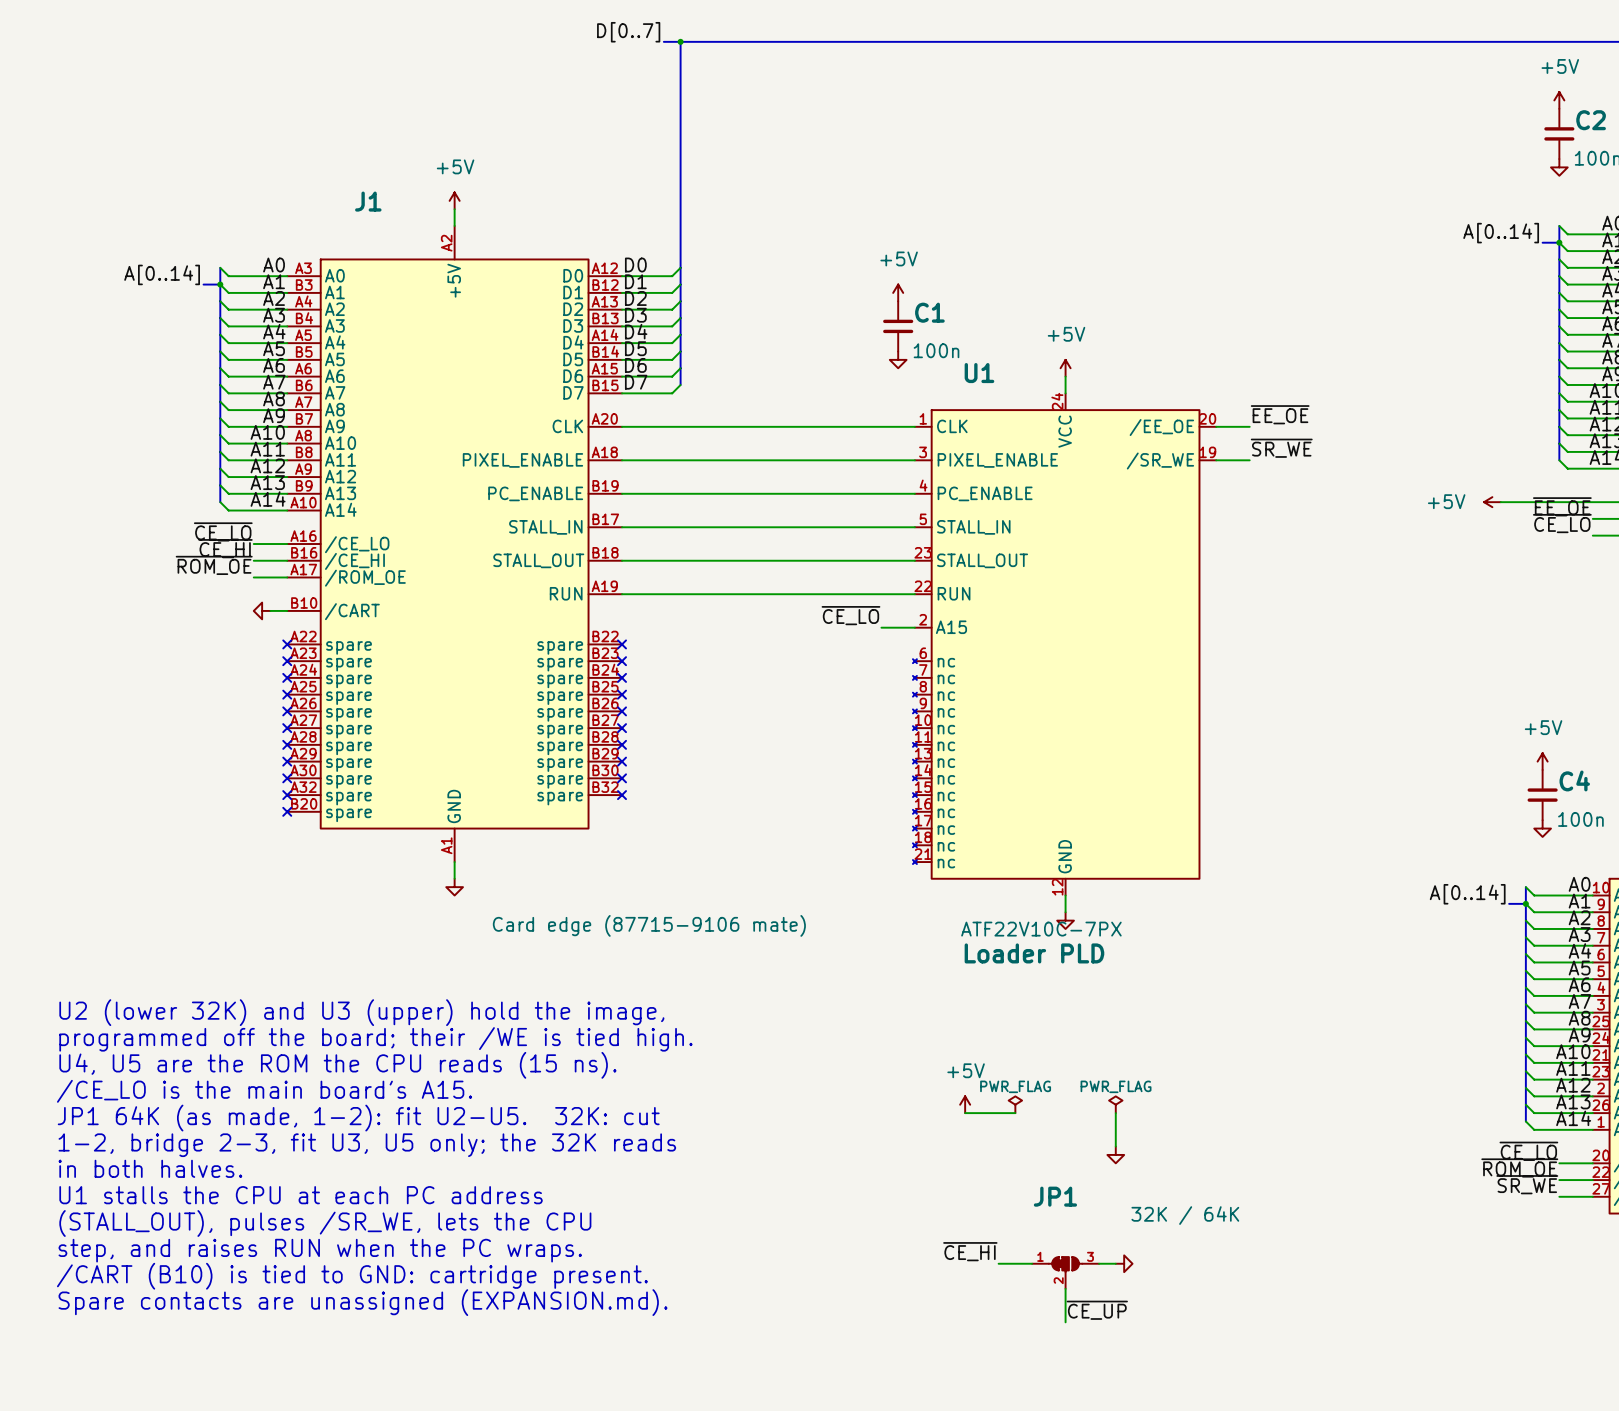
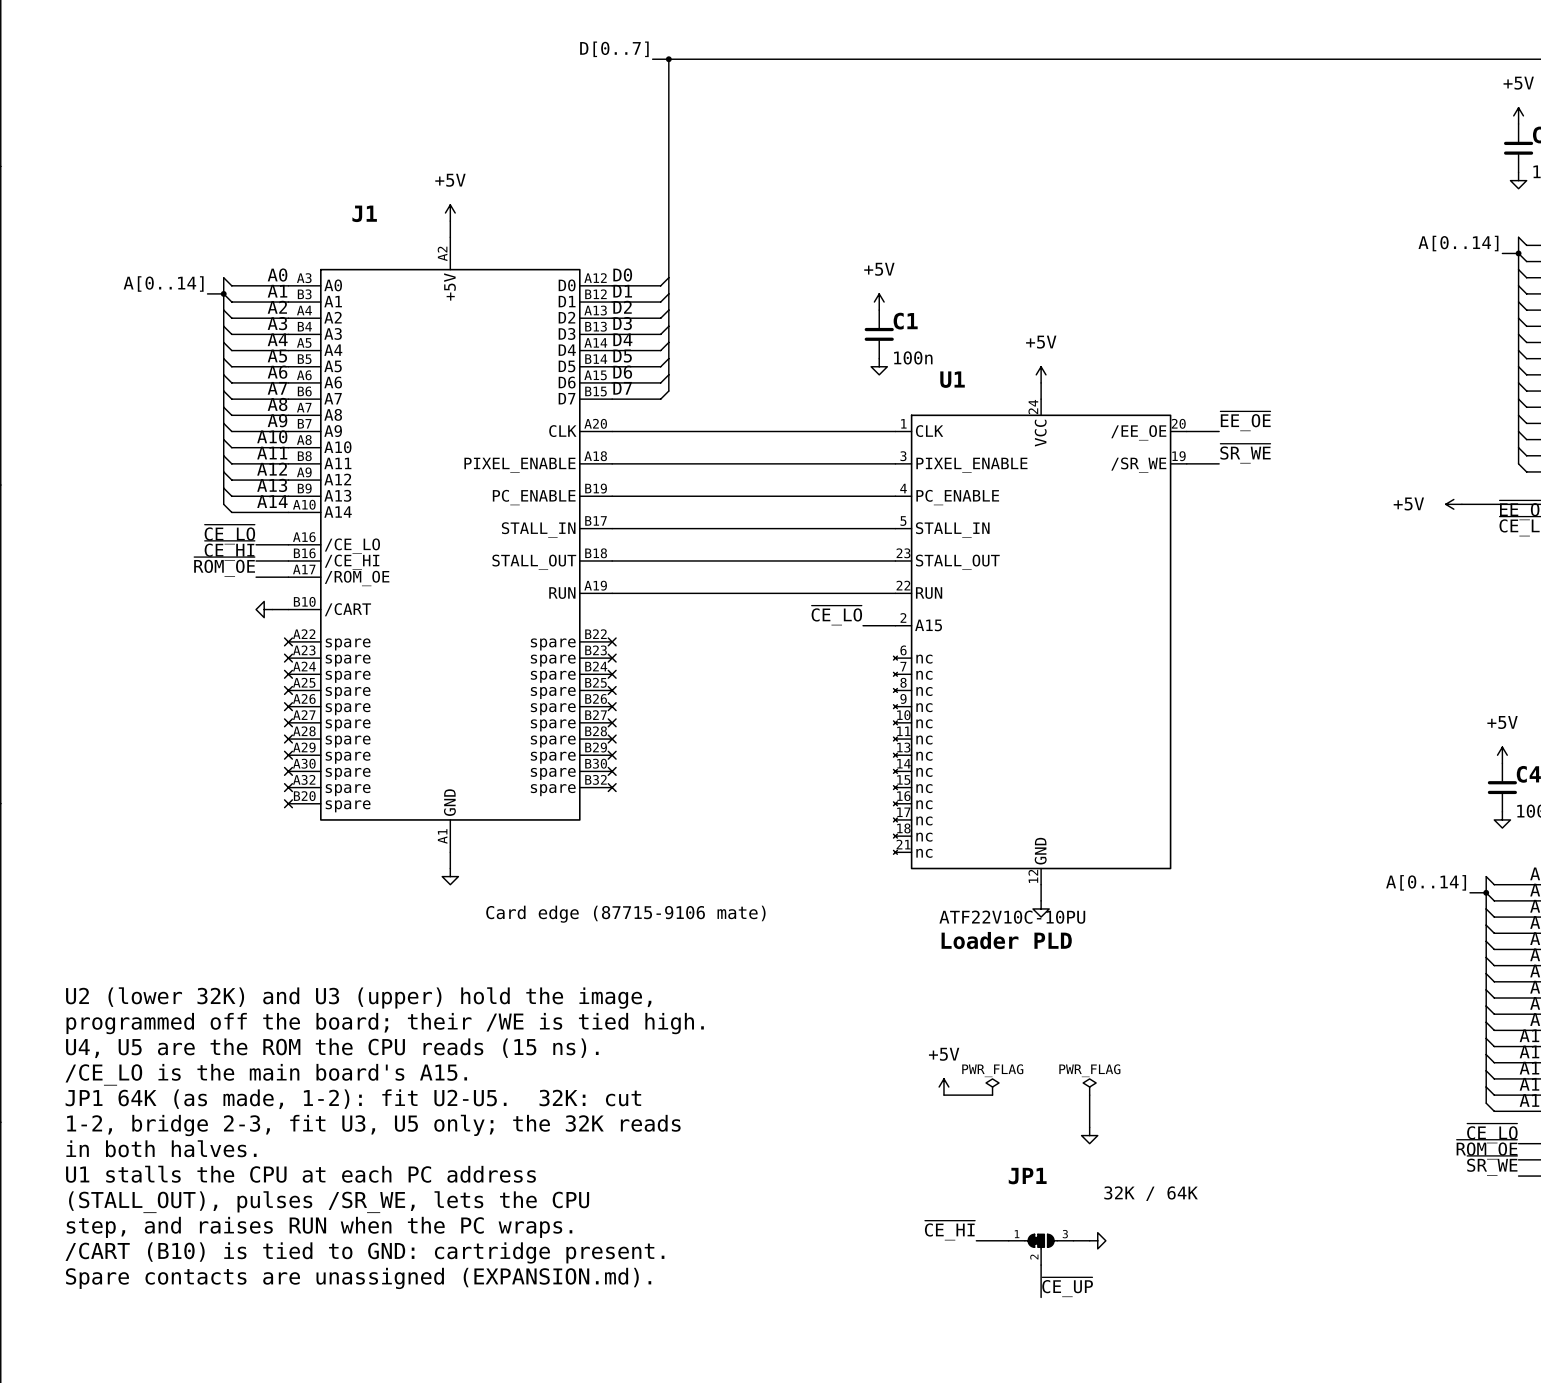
U1 value: ATF22V10C-7PX (1041, 929) -> ATF22V10C-10PU (1012, 917)

